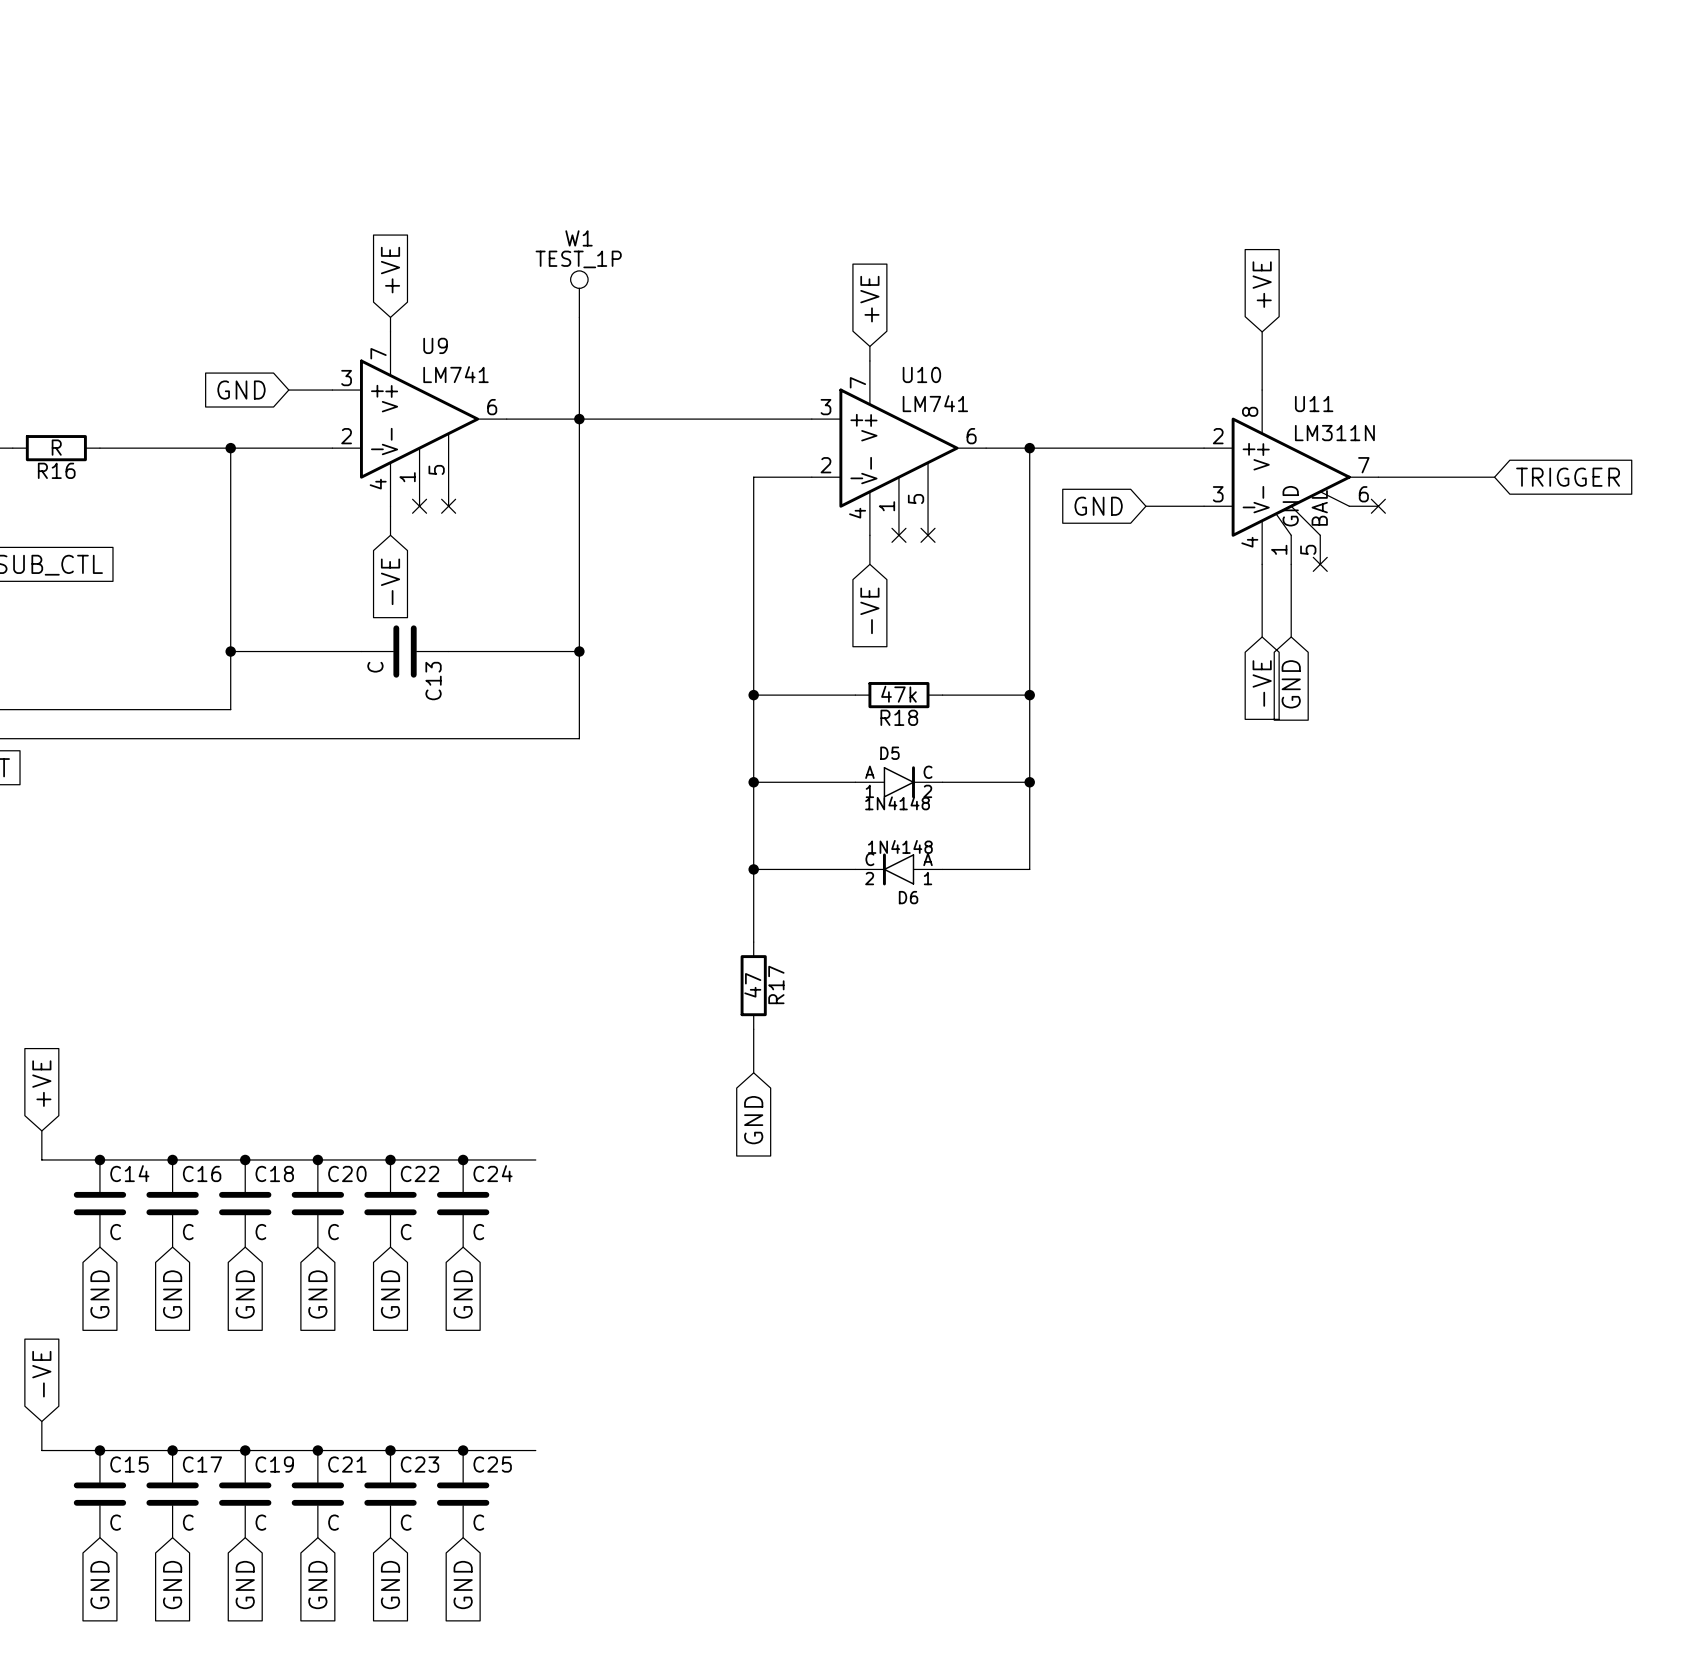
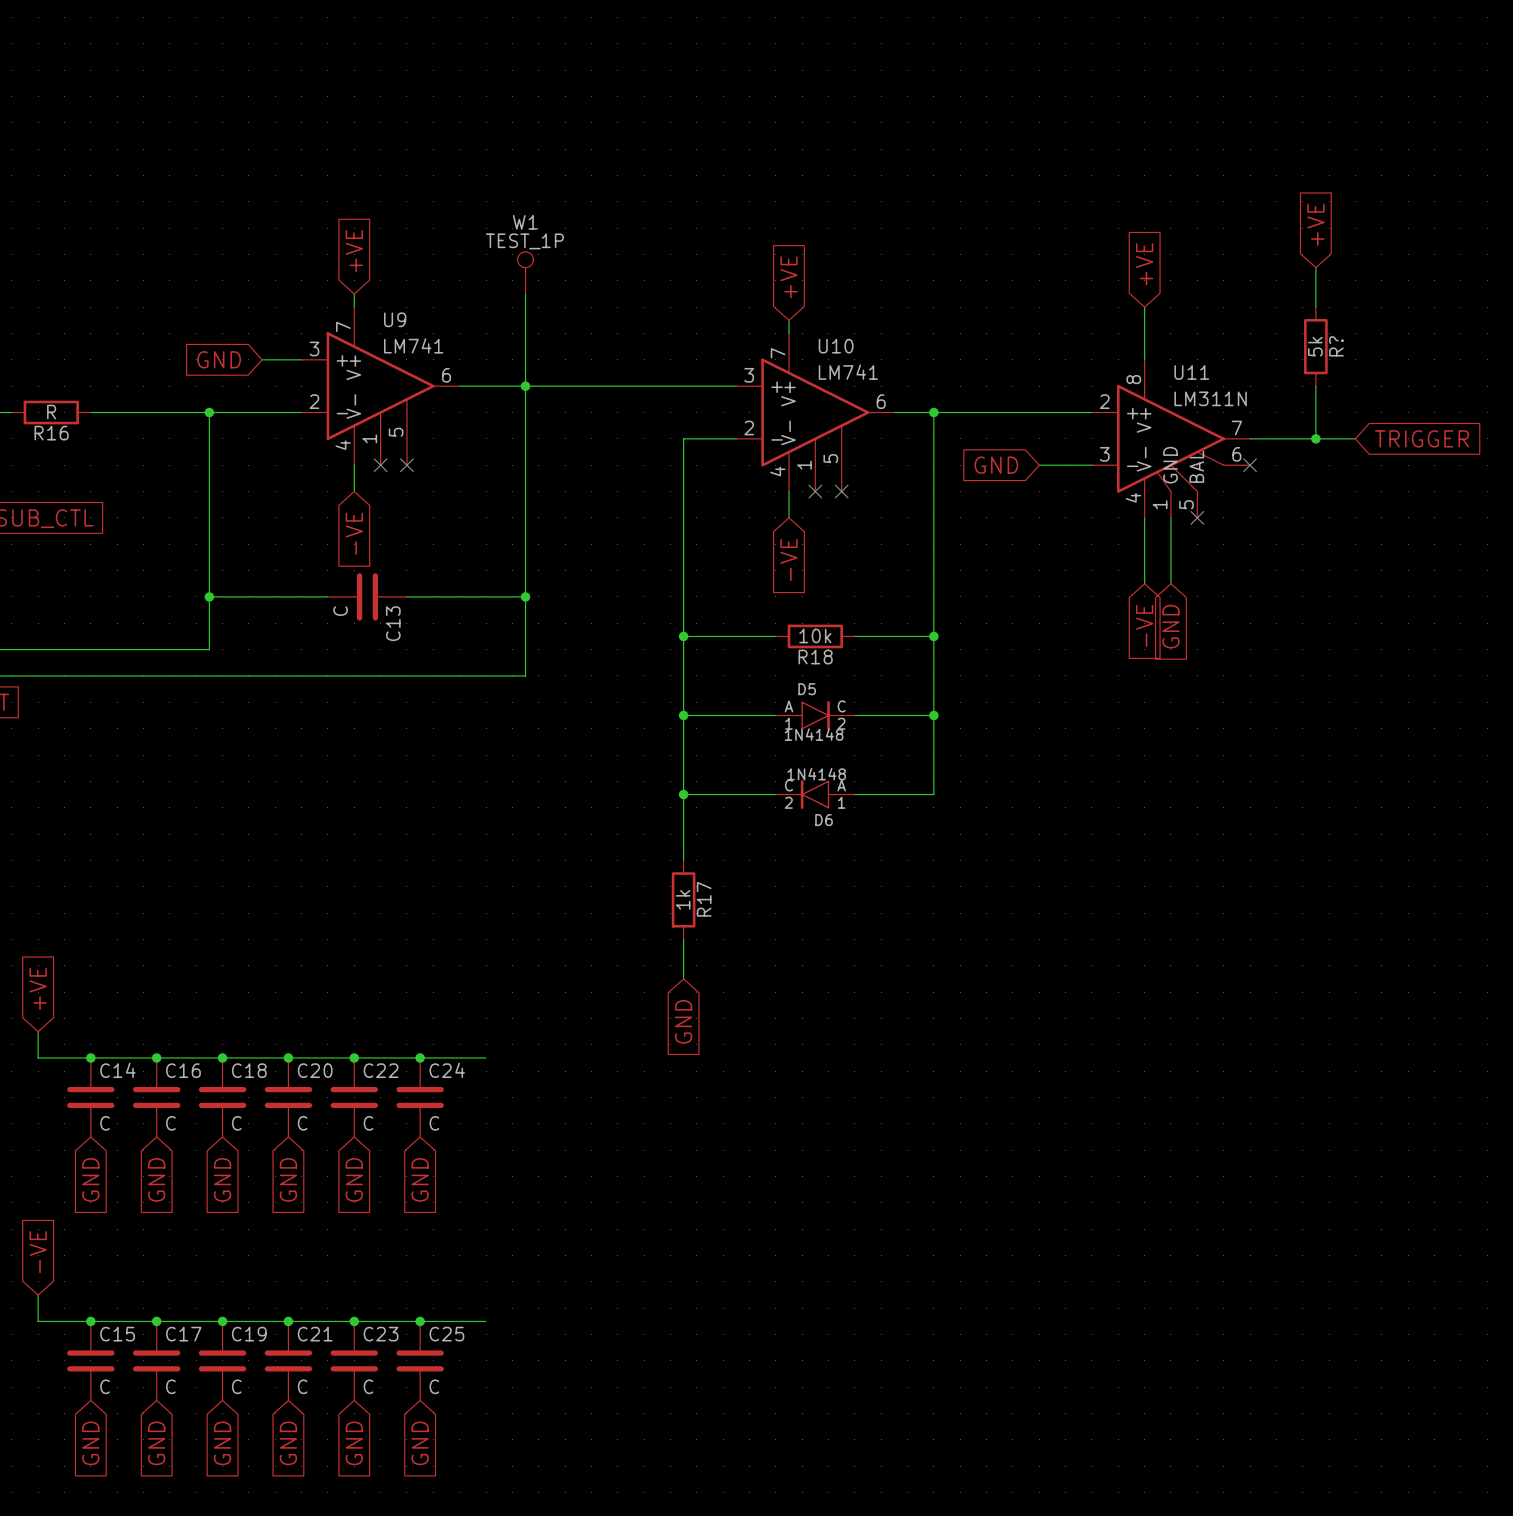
global label: none -> +VE (1315, 224)
wire: none -> (1315, 267) (1315, 307)
R?: none -> 5k (1315, 346)
wire: none -> (1315, 386) (1315, 438)
junction: none -> (1315, 438)
R18 value: 47k (898, 694) -> 10k (815, 635)
R17 value: 47 (752, 985) -> 1k (683, 899)

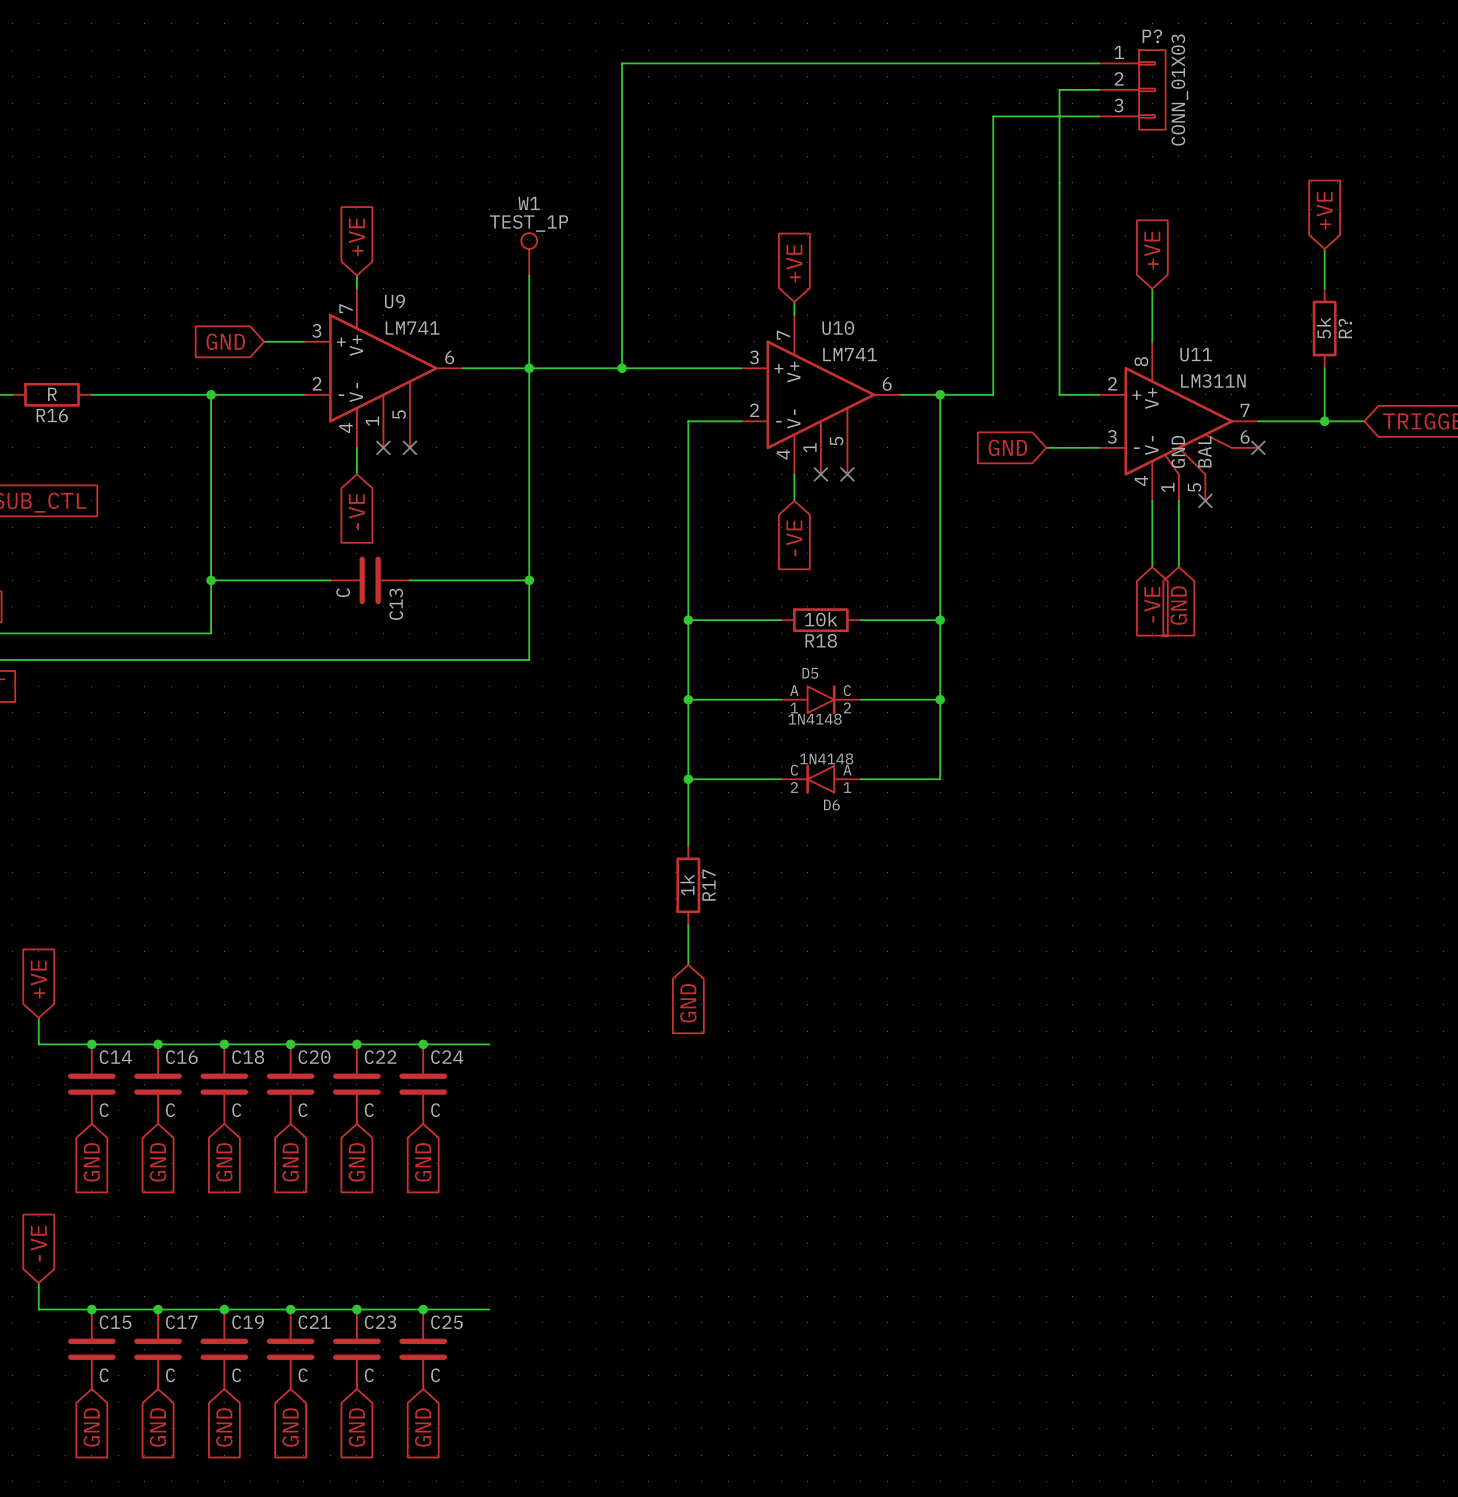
wire: none -> (1099, 63) (622, 63) (622, 368)
wire: none -> (1099, 89) (1059, 89) (1059, 394)
P?: none -> CONN_01X03 (1132, 89)
junction: none -> (622, 368)
wire: (986, 412) (1052, 412) -> (993, 394) (993, 116) (1099, 116)

